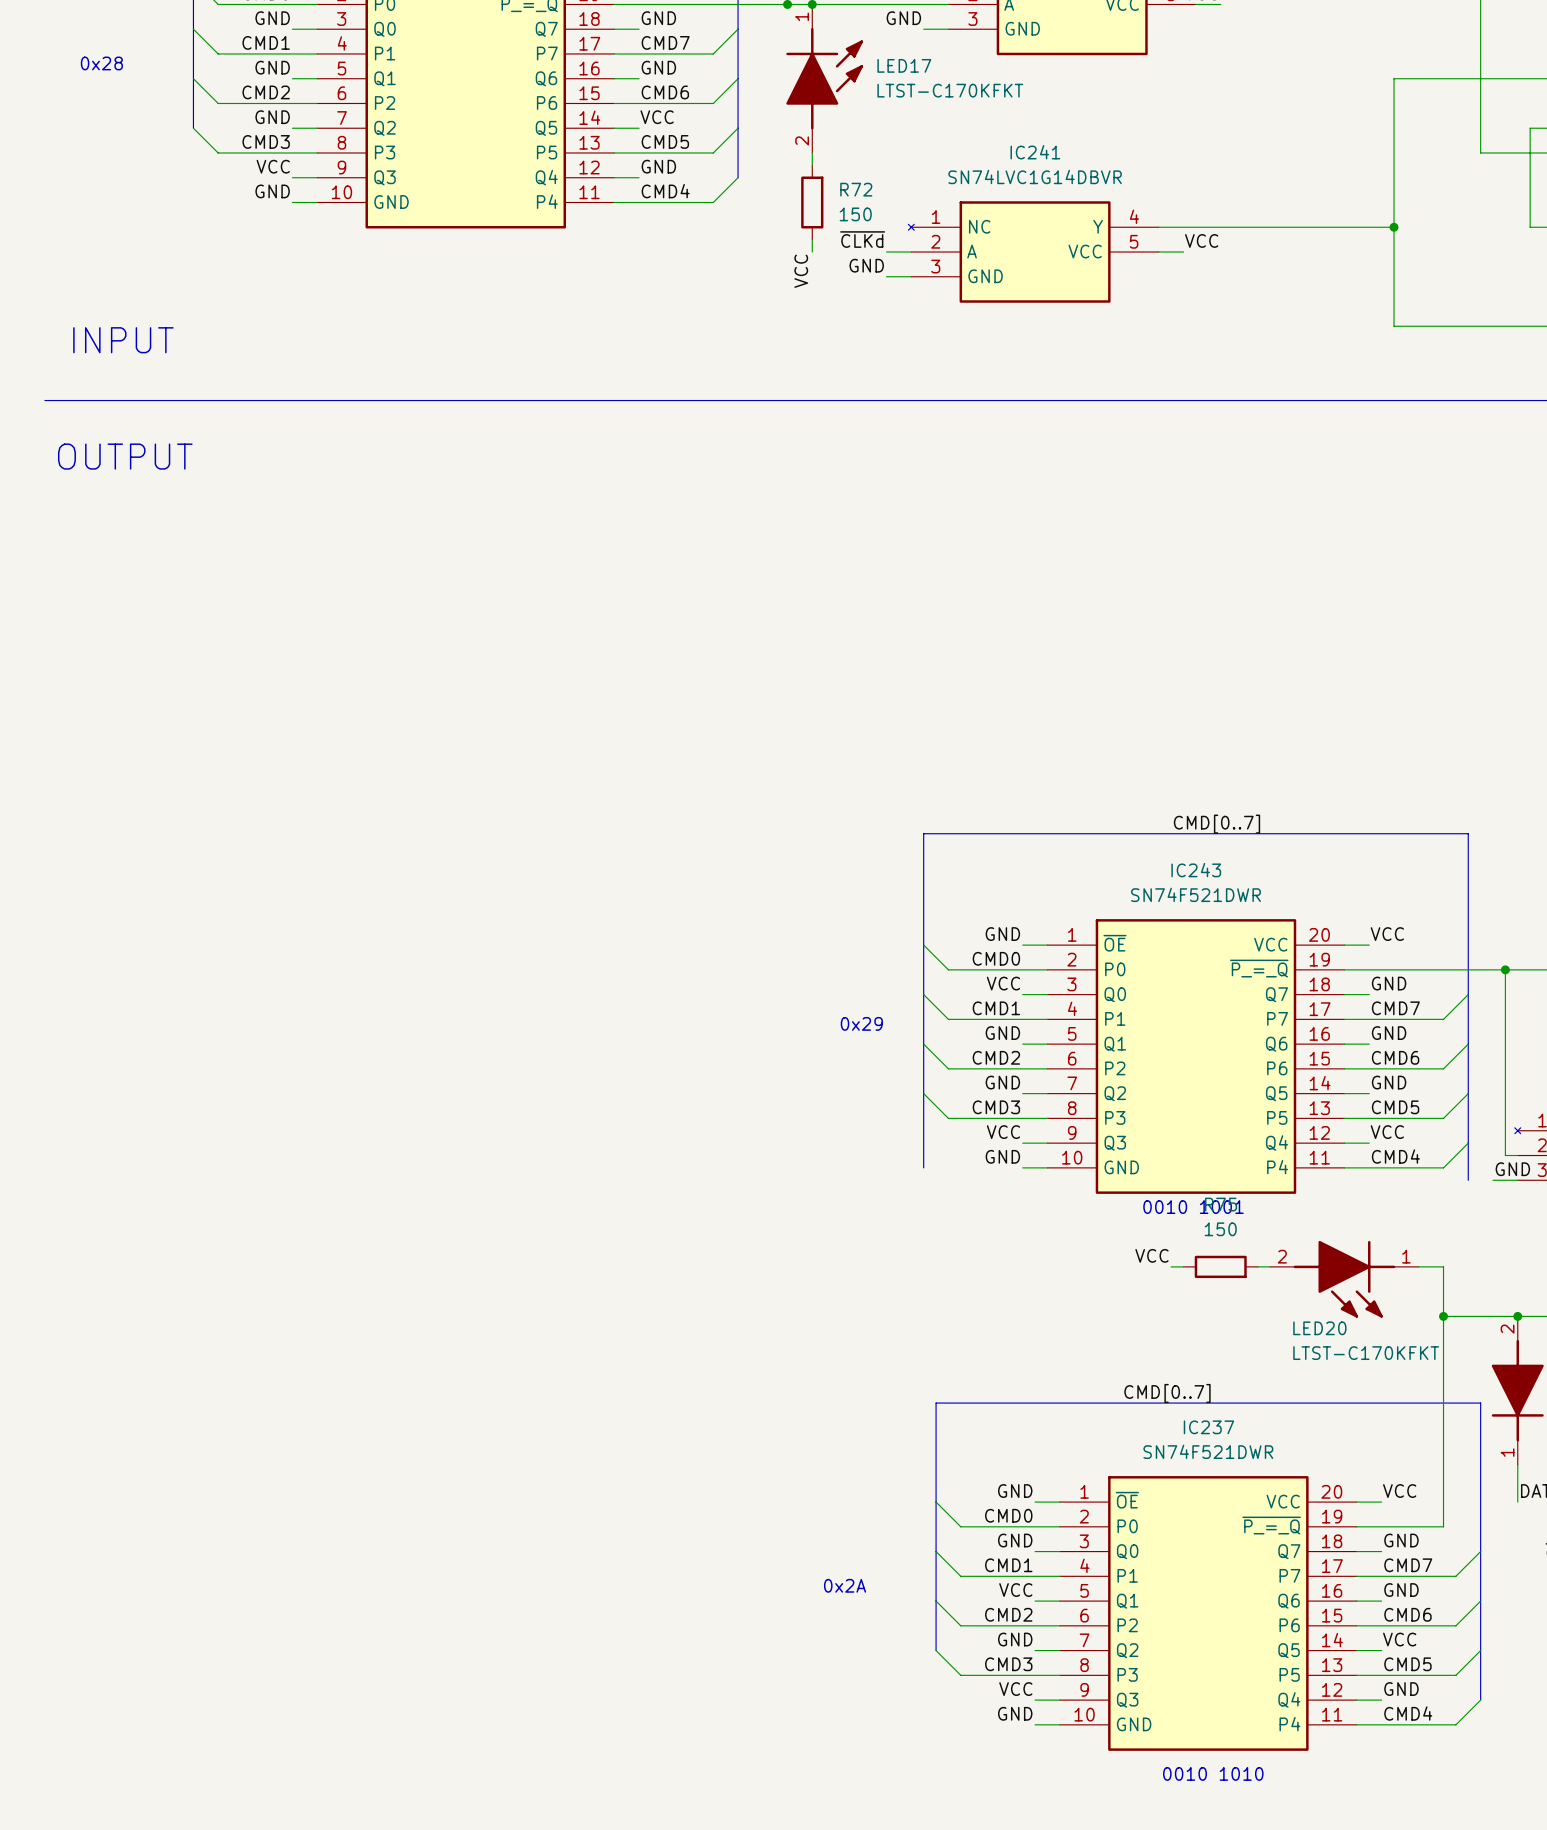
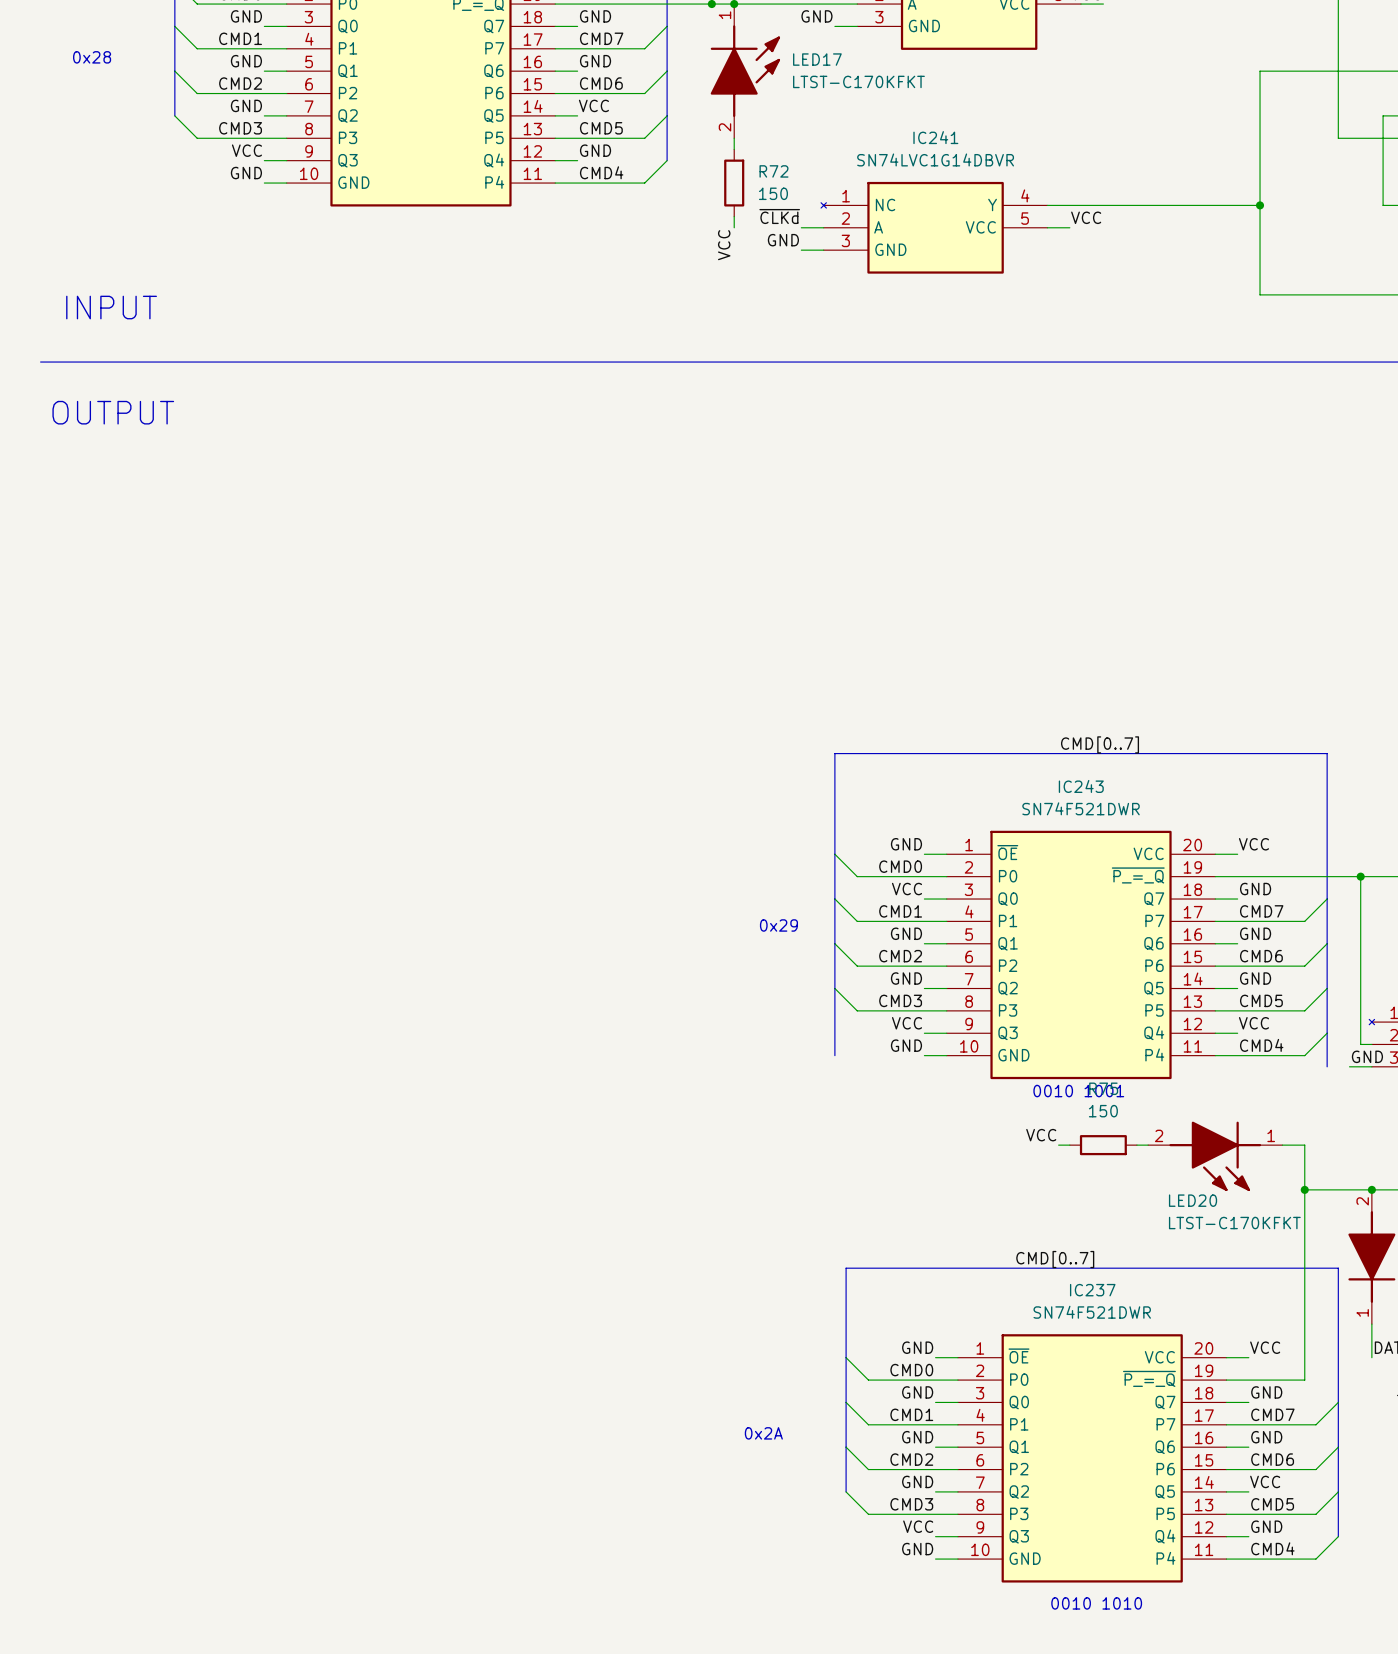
label: VCC (1015, 1590) -> GND (917, 1437)

